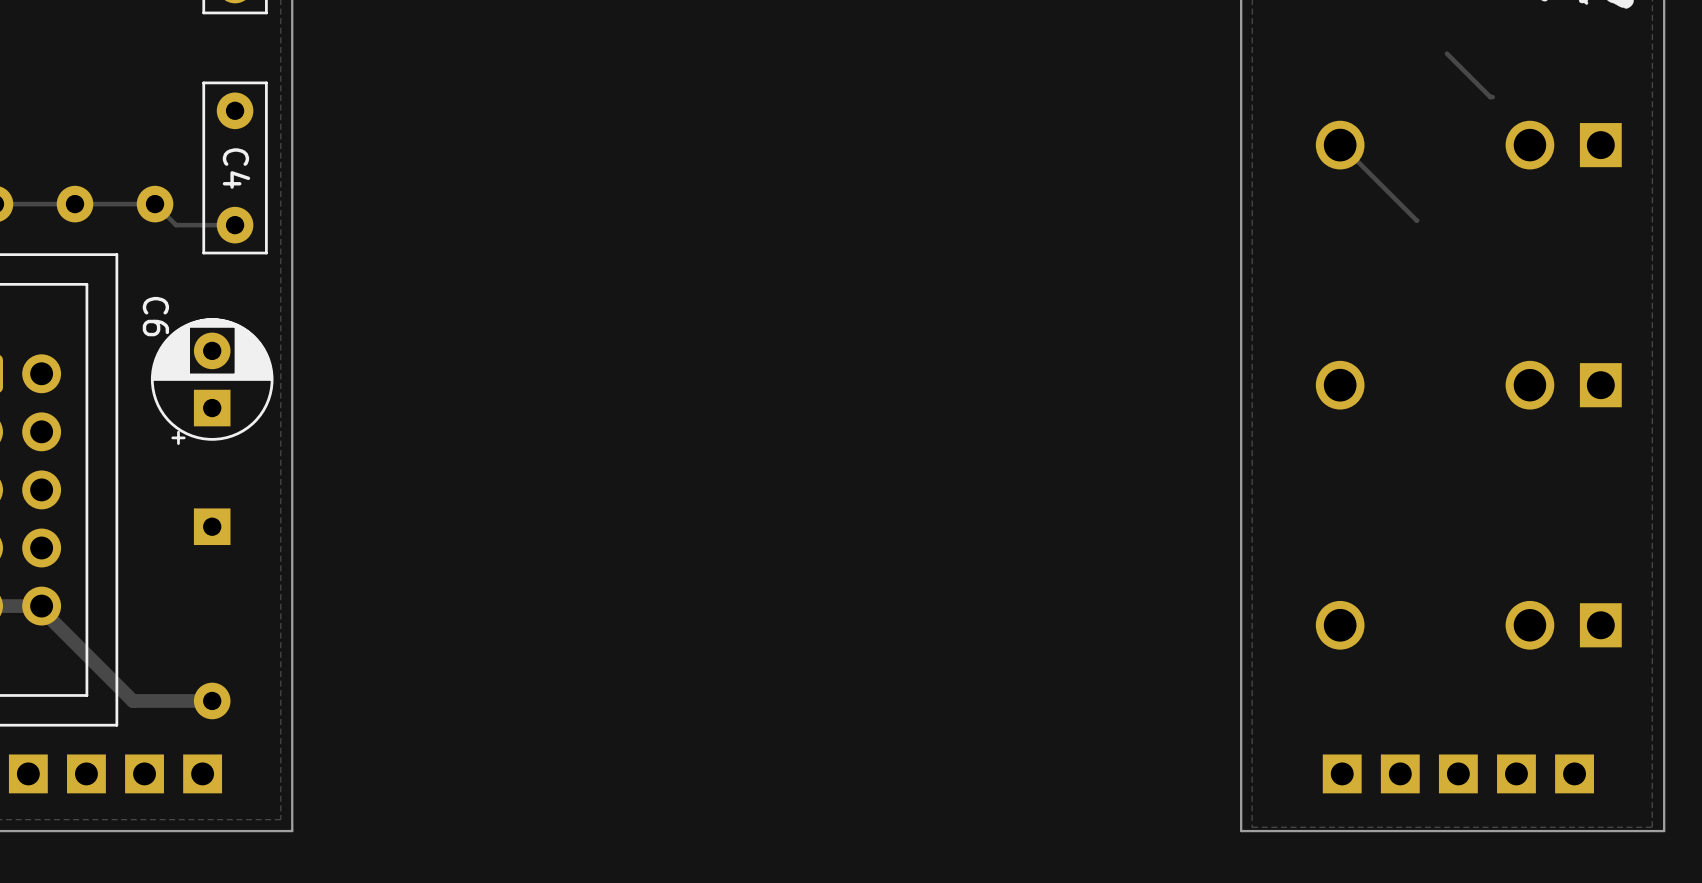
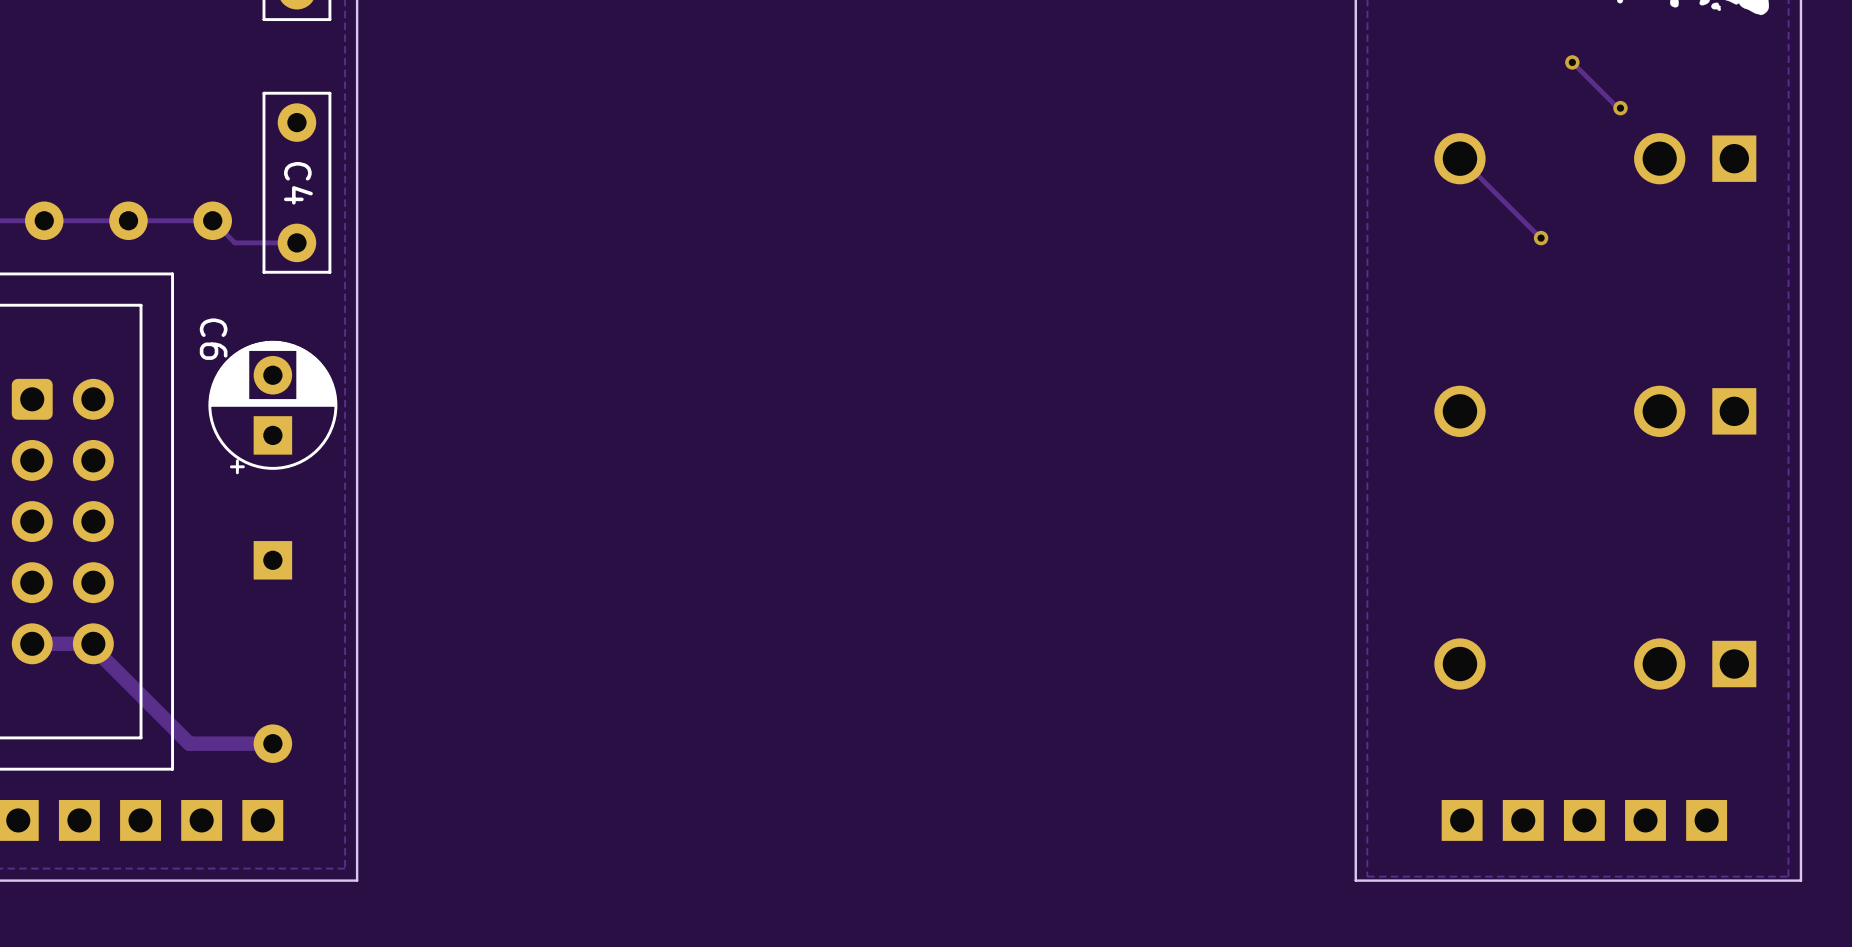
via: none -> (1572, 62)
via: none -> (1620, 108)
via: none -> (1541, 238)

